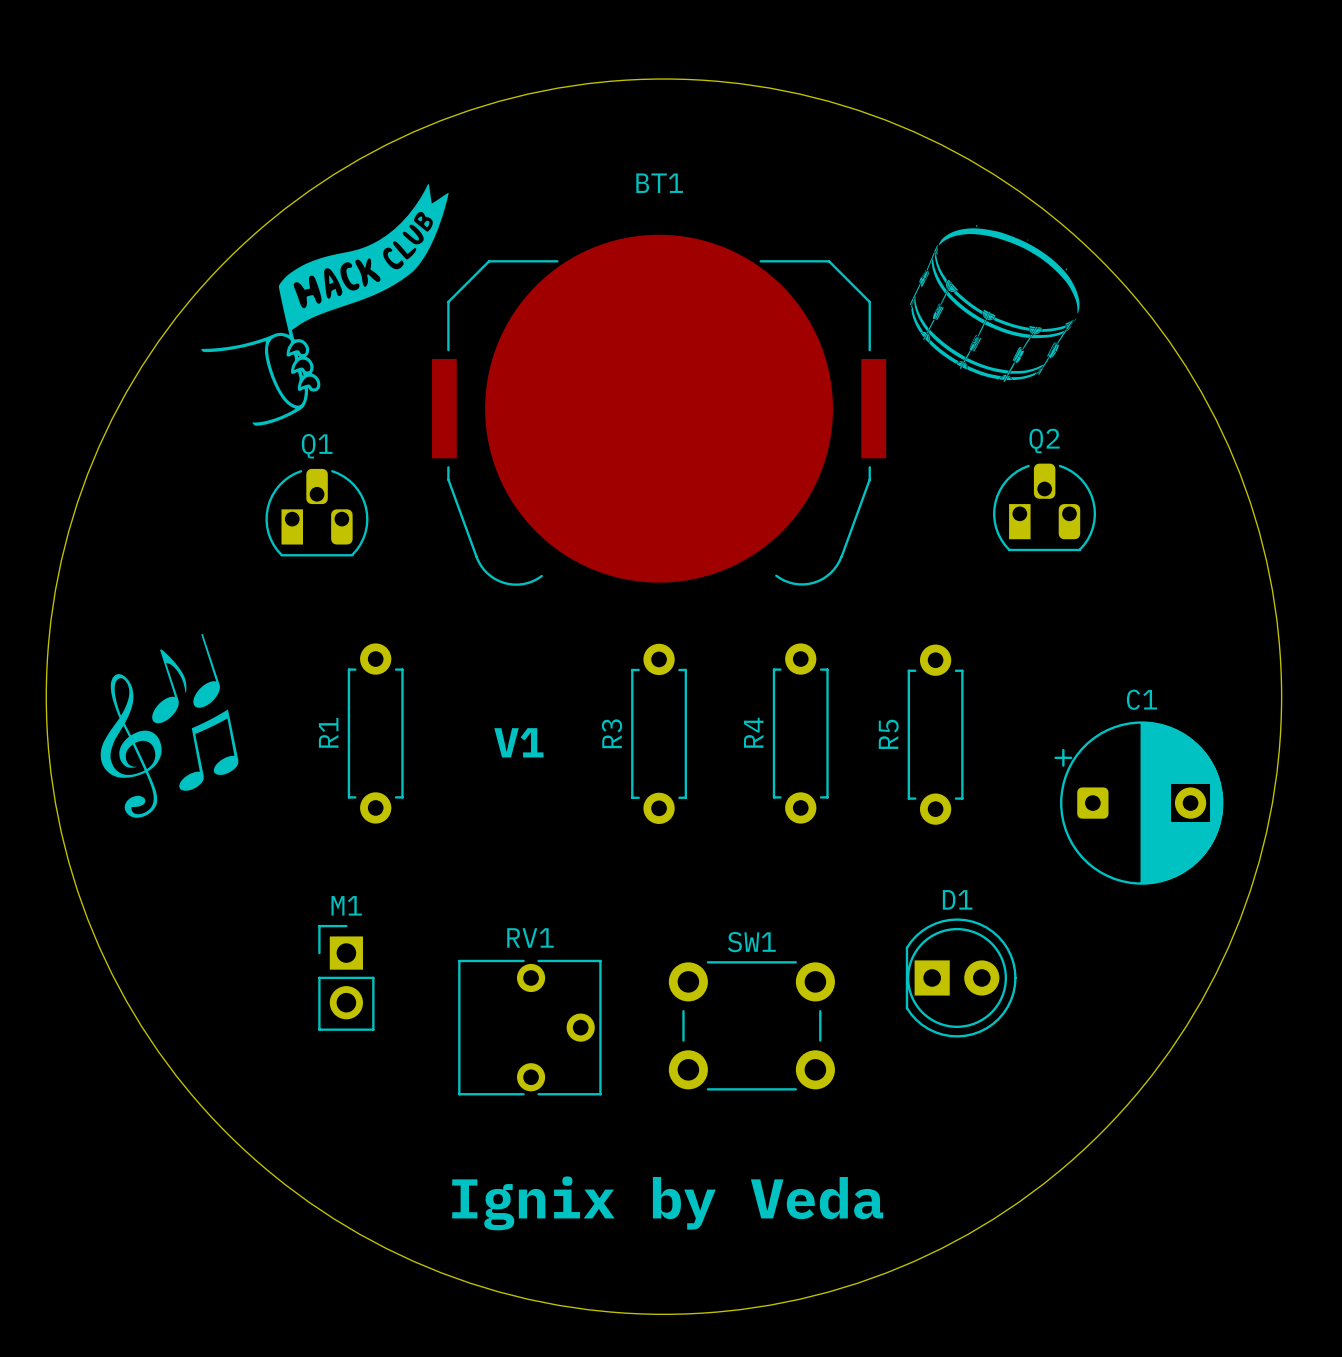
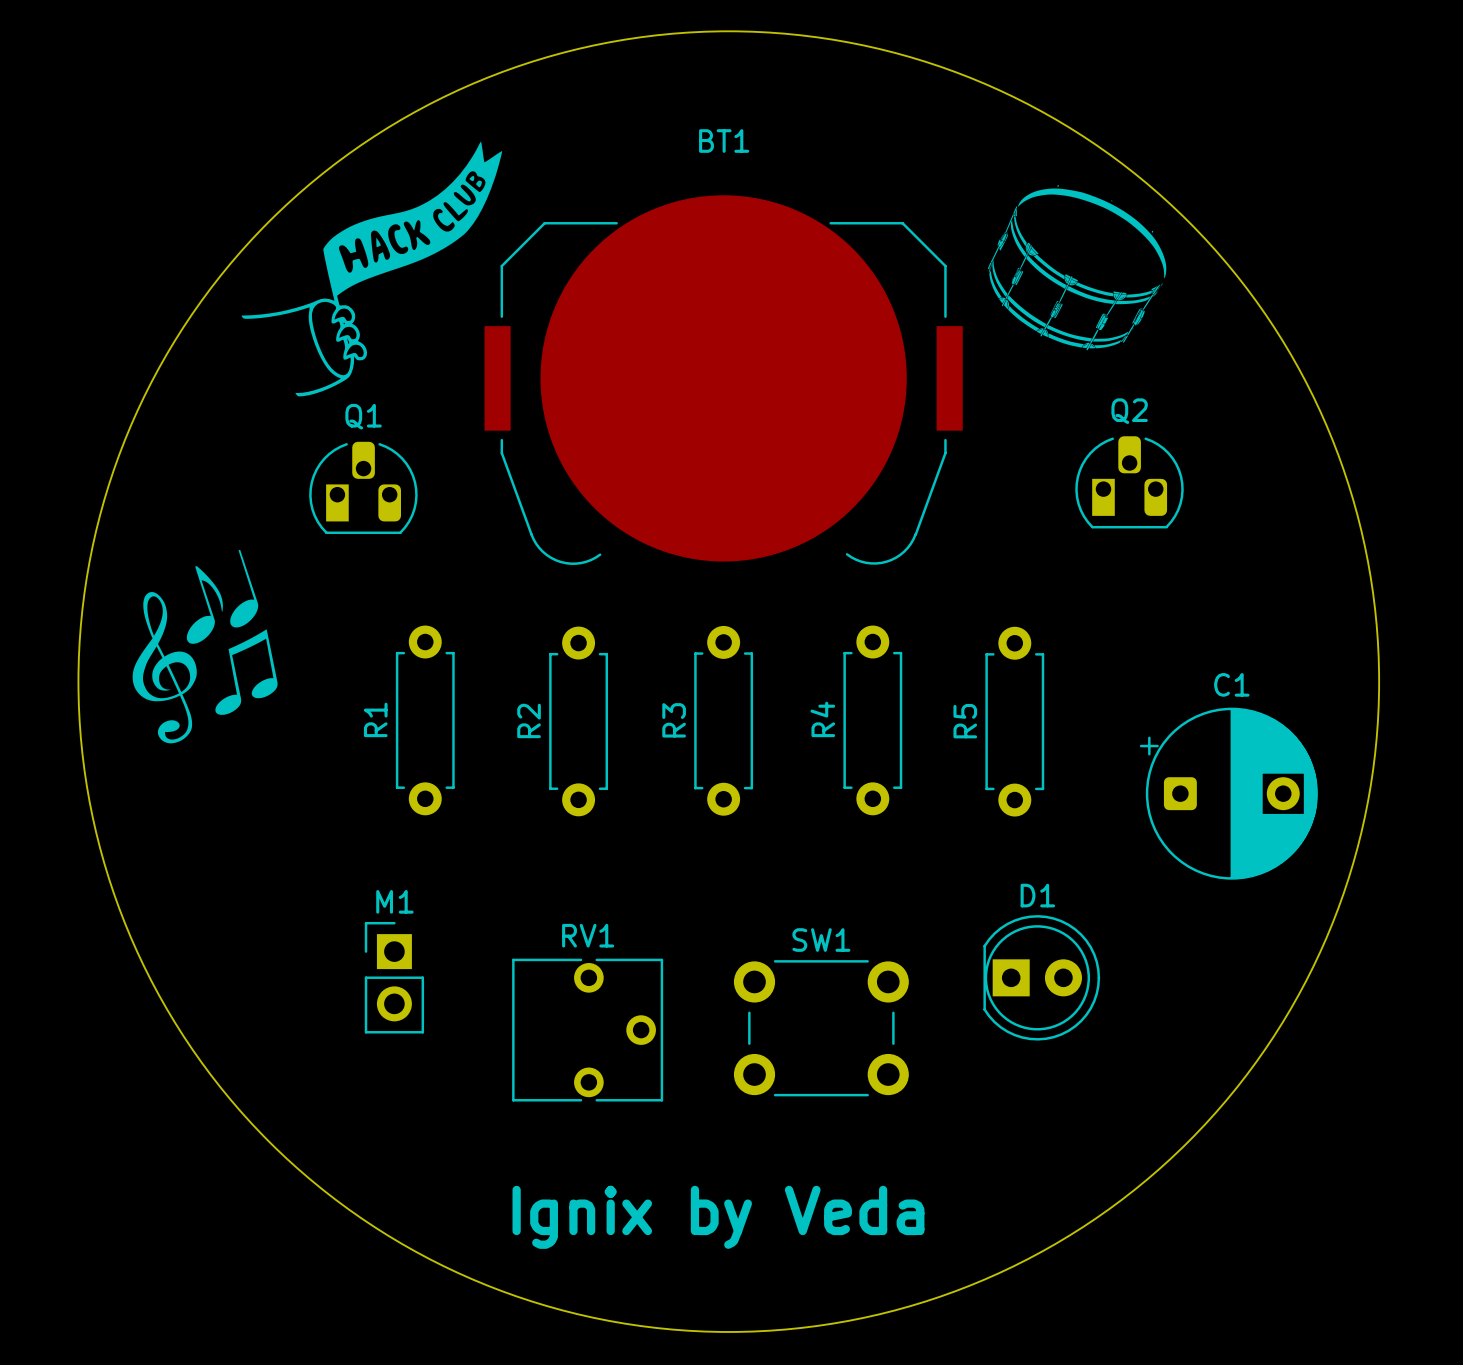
drawing position: (169, 725) -> (205, 646)
R2: none -> (578, 721)
text: V1 (518, 742) -> none

